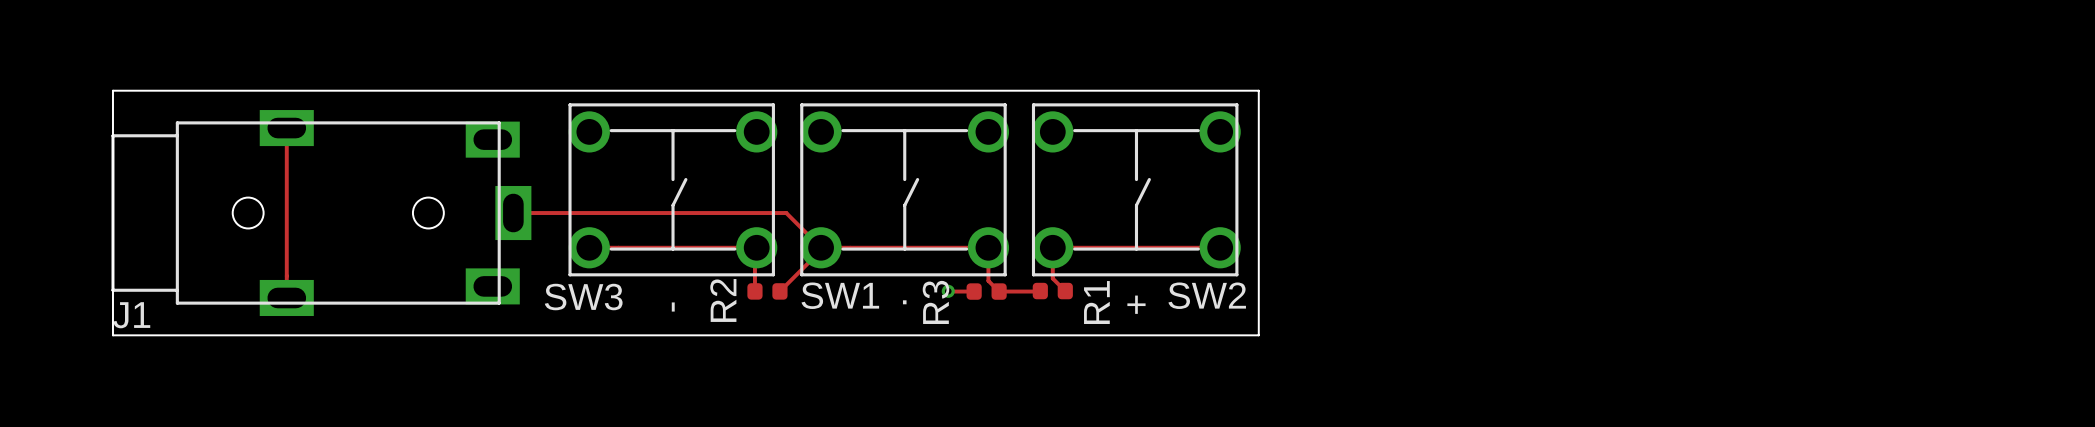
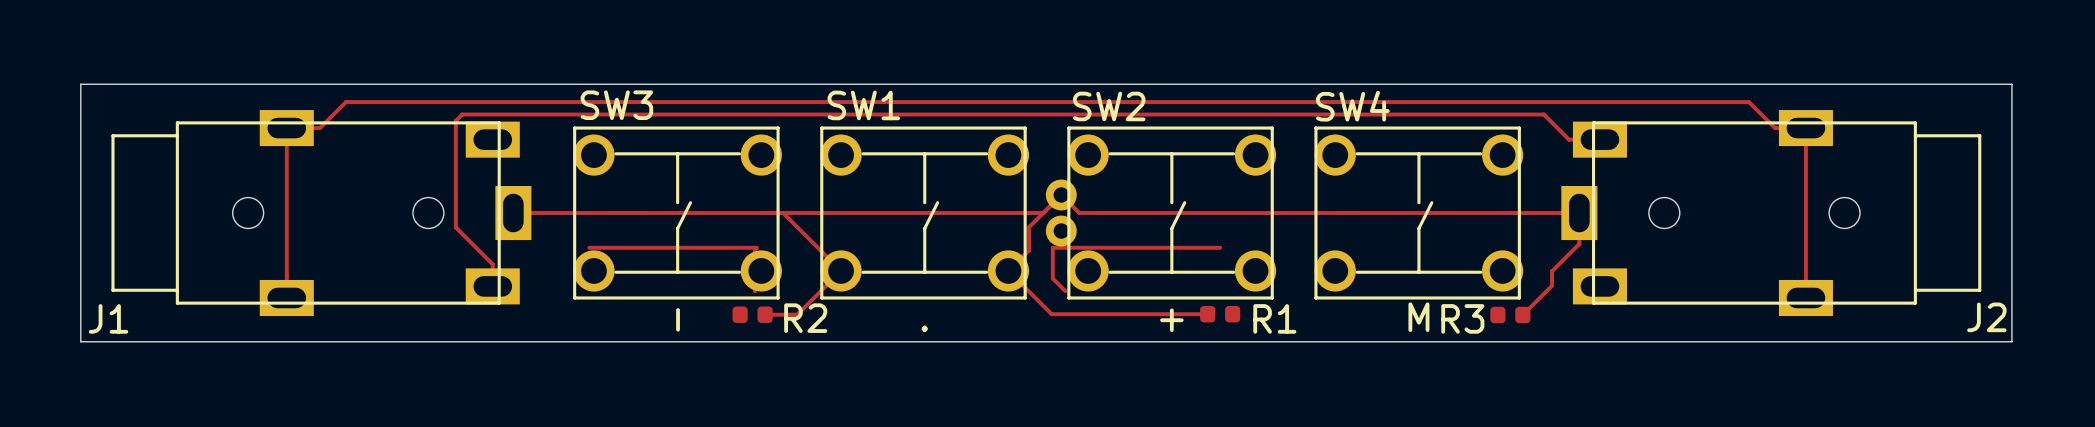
board edge: (112, 90) (112, 335) (1258, 335) (1258, 90) (112, 90) -> (80, 84) (80, 341) (2011, 341) (2011, 84) (80, 84)
top track: none -> (286, 128) (320, 128) (346, 102) (1748, 102) (1774, 128) (1805, 128) (1805, 297)
top track: none -> (1599, 139) (1569, 139) (1543, 114) (462, 114) (455, 120) (455, 227) (492, 264) (492, 286)
SW3 position: (672, 189) -> (677, 213)
SW1 position: (904, 189) -> (924, 213)
SW2 position: (1136, 189) -> (1171, 213)
top track: none -> (783, 213) (841, 270) (797, 314) (765, 314)
top track: (786, 213) (821, 247) -> (786, 213) (1043, 213)
part: none -> (1061, 213)
SW4: none -> (1418, 213)
J2: none -> (1771, 213)
top track: (821, 247) (988, 247) (988, 280) (999, 291) (1040, 291) -> none
top track: (821, 247) (821, 250) (779, 291) -> none
R2 position: (767, 291) -> (752, 314)
top track: (948, 291) (974, 291) -> none
via: (948, 291) -> none
R3 position: (986, 291) -> (1510, 314)
R1 position: (1052, 291) -> (1220, 314)
SW1 name position: SW1 (840, 295) -> SW1 (863, 105)
SW2 name position: SW2 (1207, 295) -> SW2 (1109, 106)
SW3 name position: SW3 (583, 297) -> SW3 (616, 105)
R2 name rotation: 0° (723, 300) -> 90° clockwise (805, 318)
R2 name position: R2 (723, 300) -> R2 (805, 318)
text position: . (904, 302) -> . (924, 328)
R3 name rotation: 0° (935, 302) -> 90° clockwise (1462, 318)
R1 name rotation: 0° (1096, 302) -> 90° clockwise (1274, 318)
text position: + (1136, 304) -> + (1171, 320)
text position: - (673, 307) -> - (678, 319)
top track: none -> (1207, 314) (1051, 314) (1008, 270) (1029, 250) (1029, 227) (1061, 194) (1079, 213) (1579, 213) (1579, 243) (1552, 271) (1552, 285) (1522, 314)
J1 name position: J1 (131, 315) -> J1 (108, 318)
text: none -> M (1418, 317)

